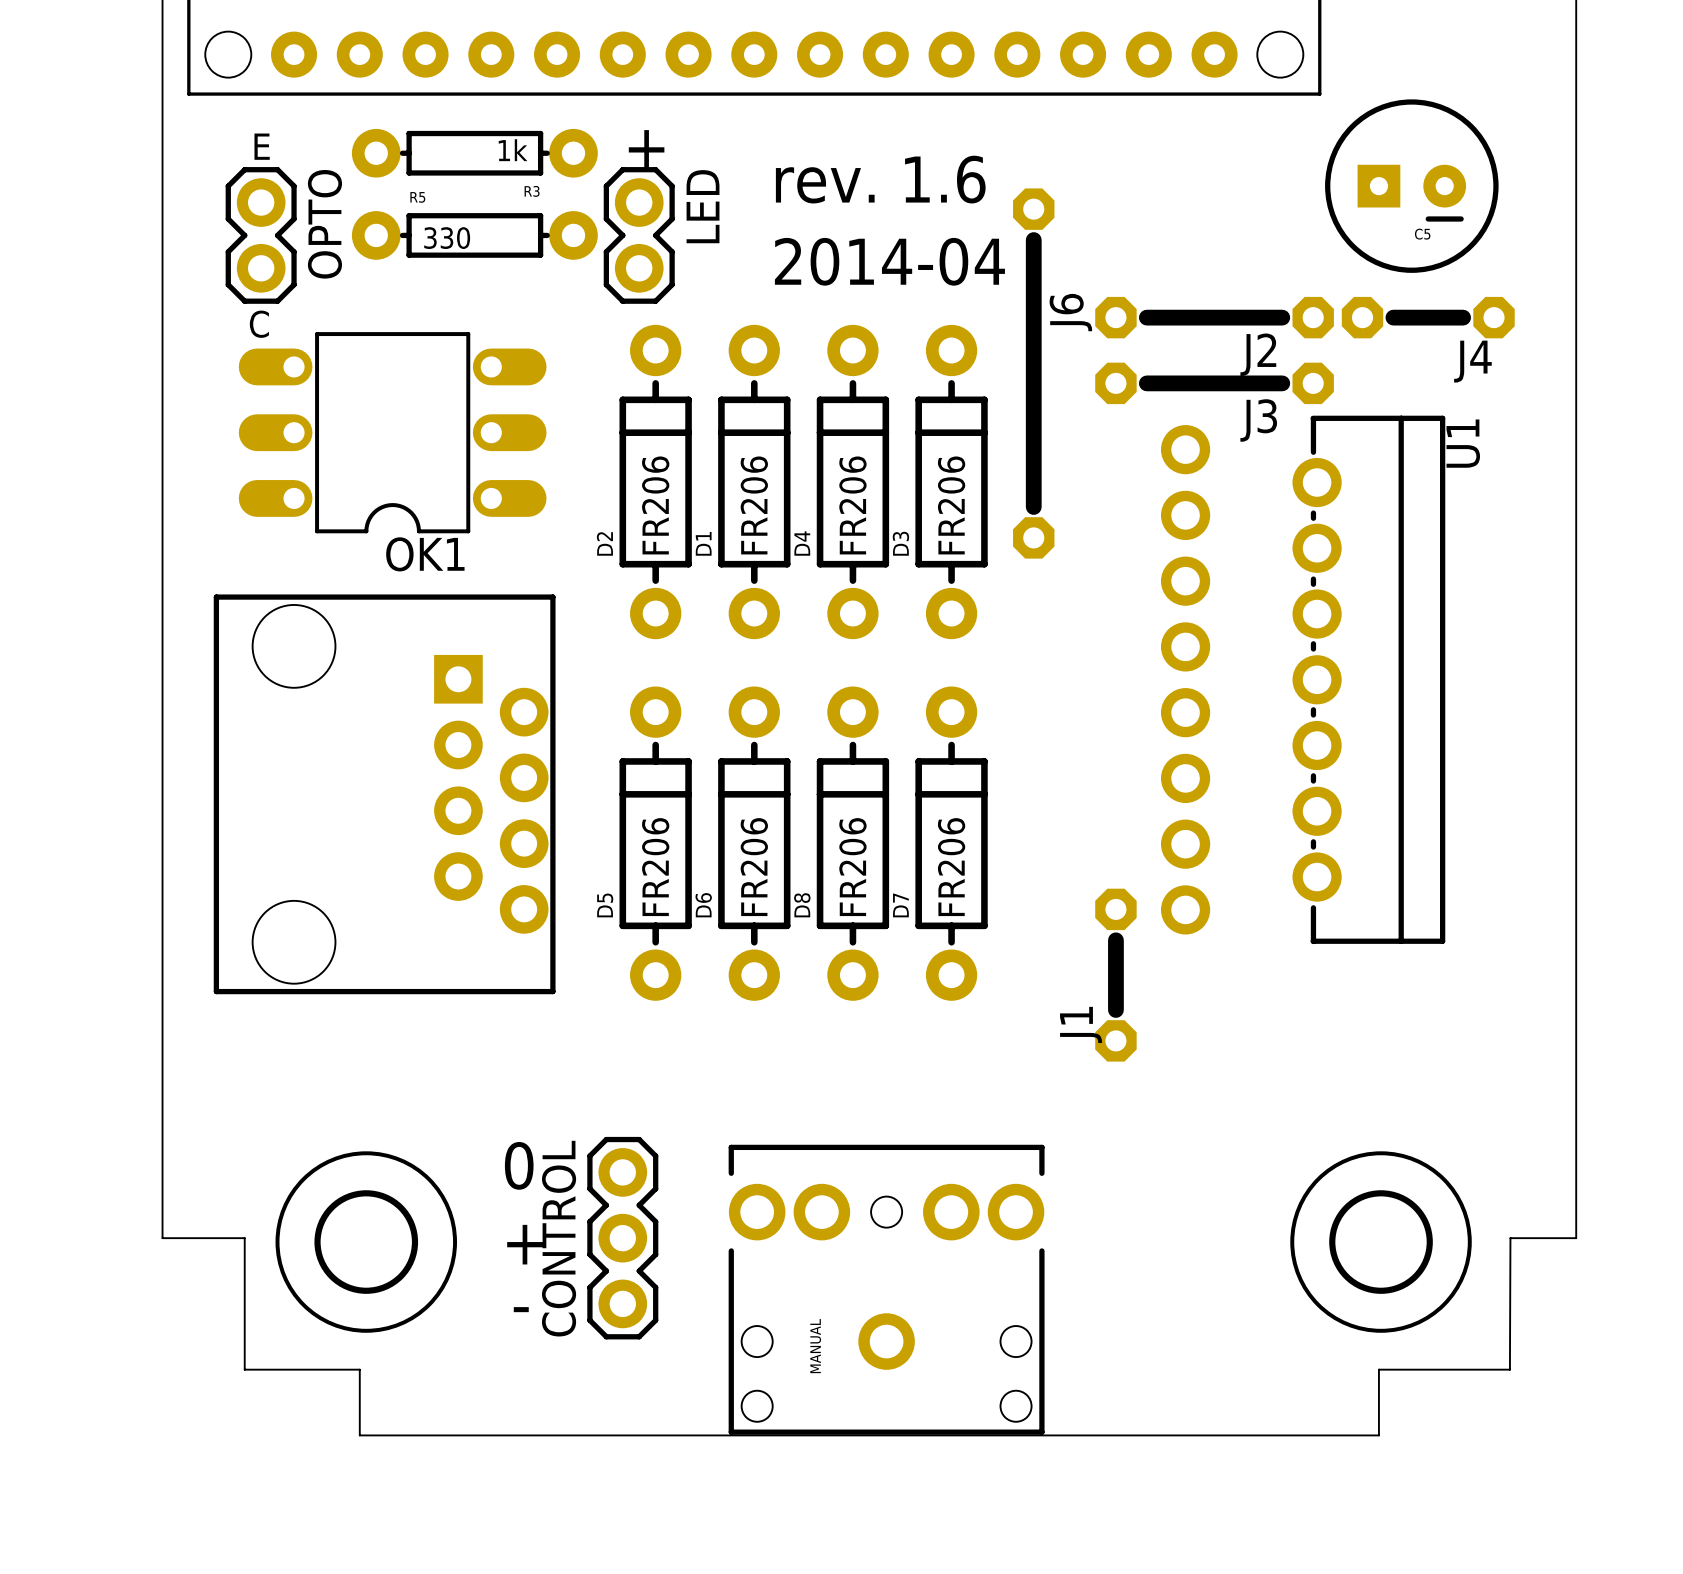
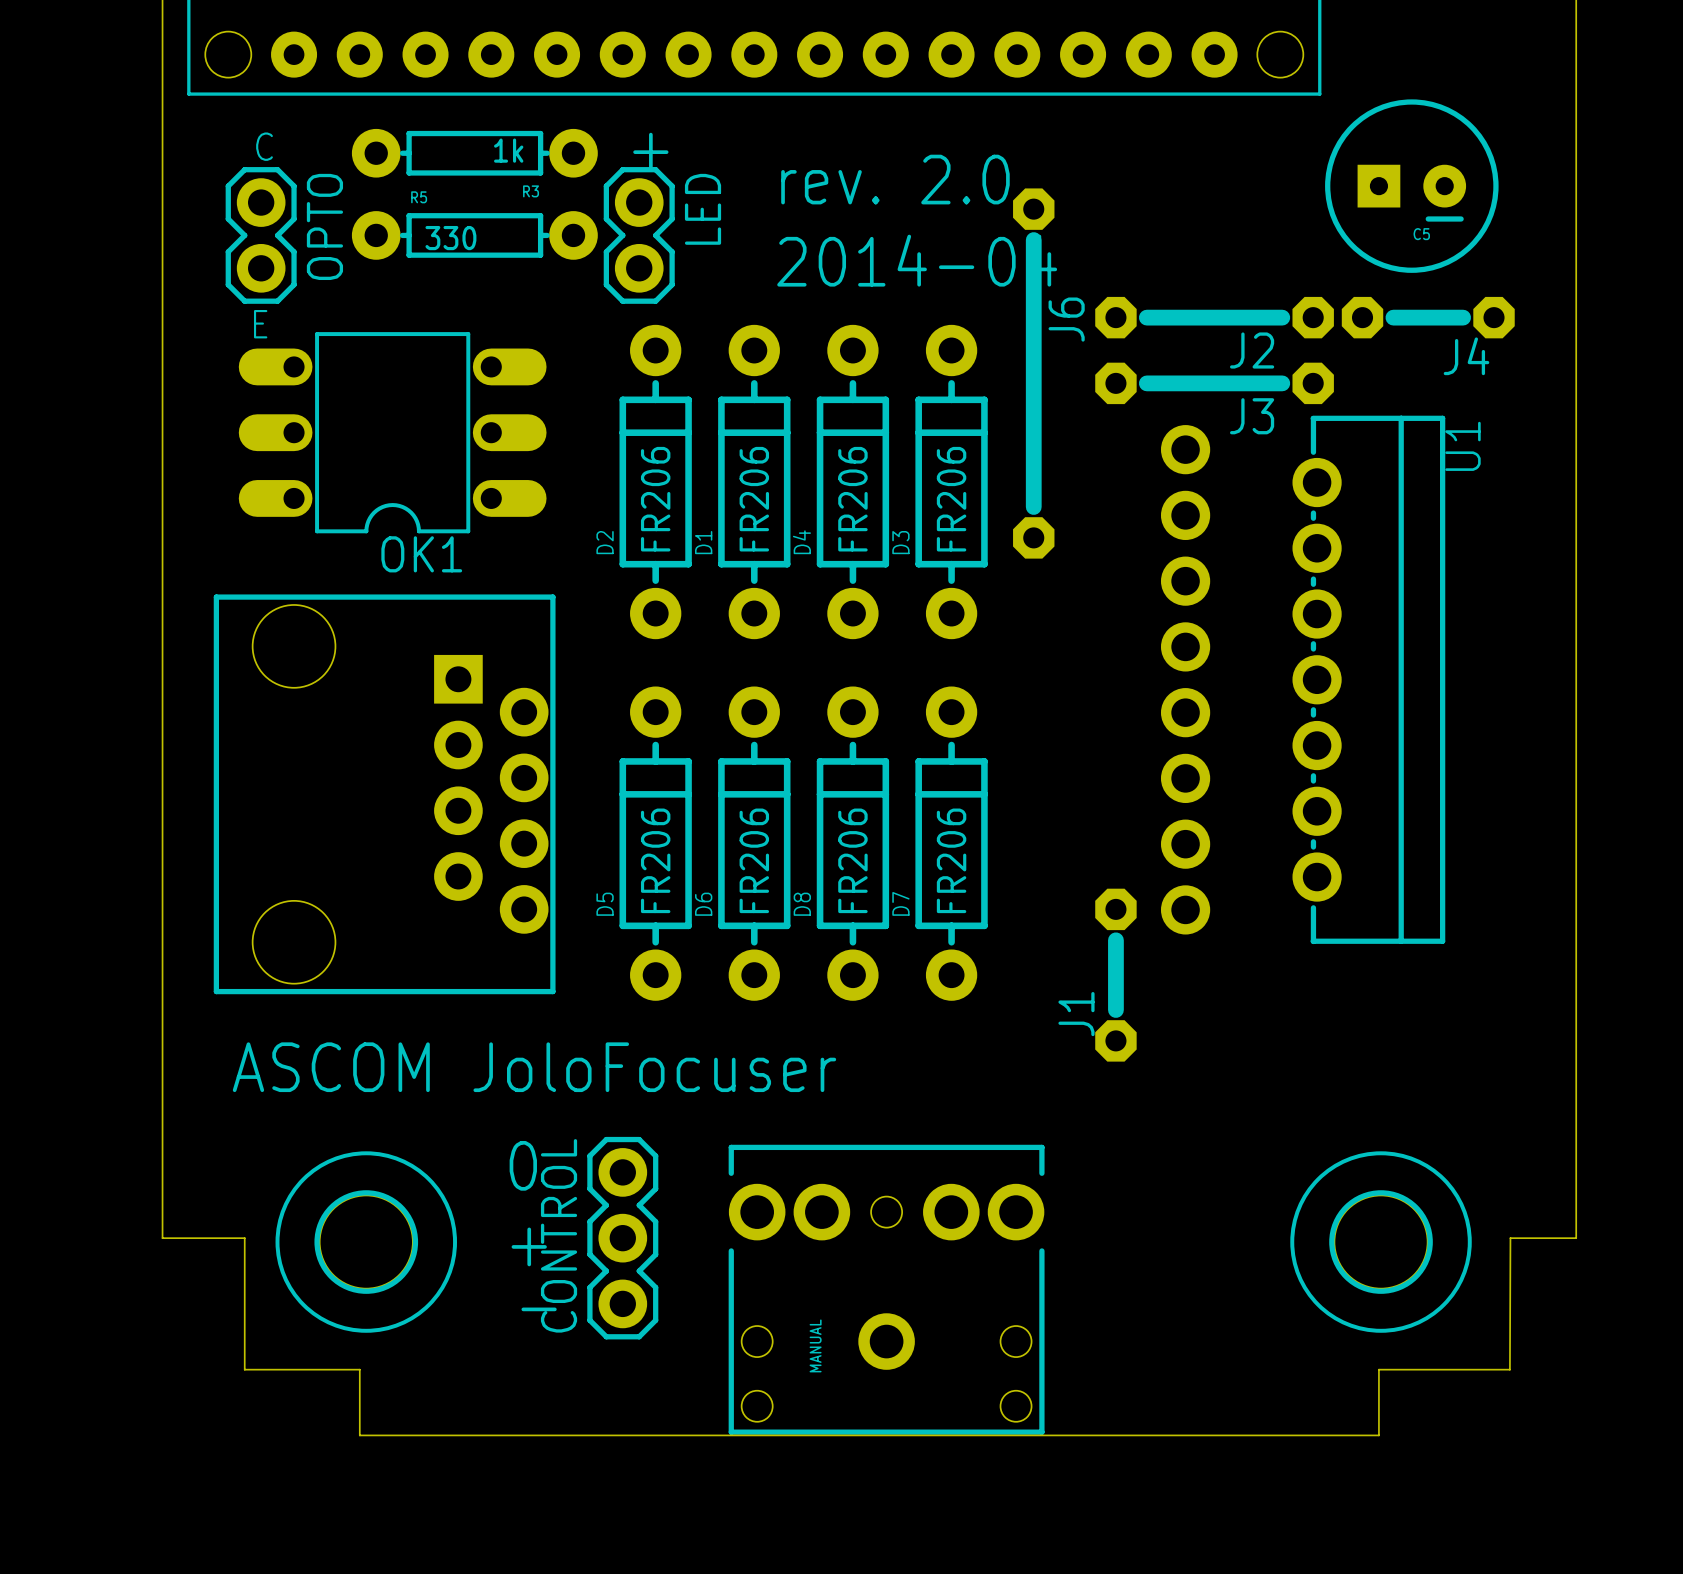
text: E (262, 146) -> C (264, 146)
text: rev. 1.6 (880, 179) -> rev. 2.0 (895, 179)
text: C (259, 324) -> E (260, 324)
text: none -> ASCOM JoloFocuser (534, 1067)

